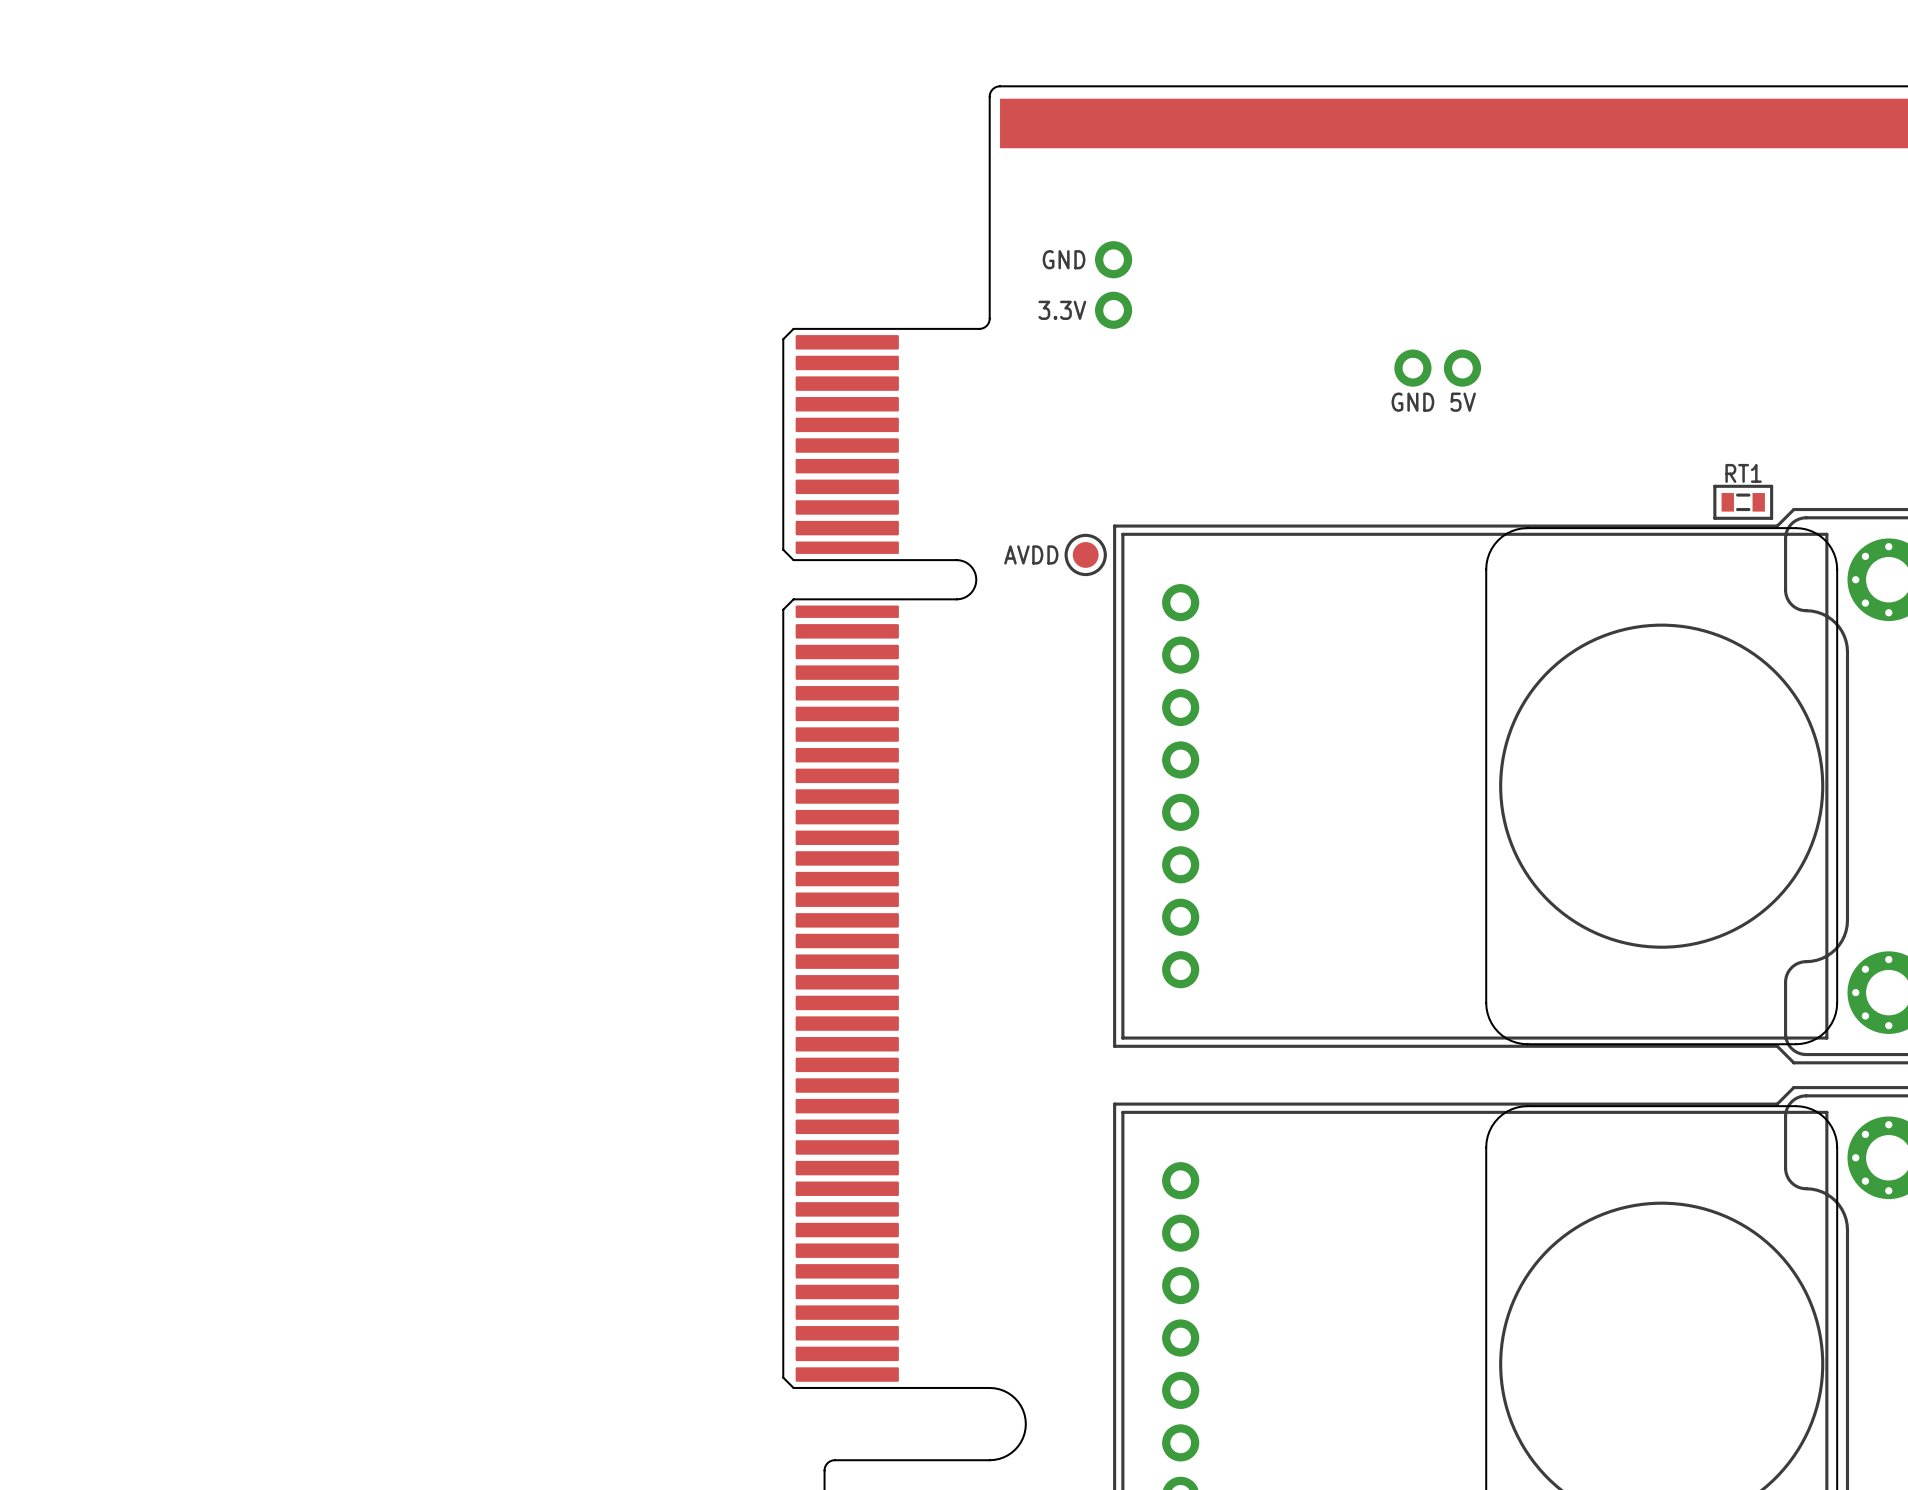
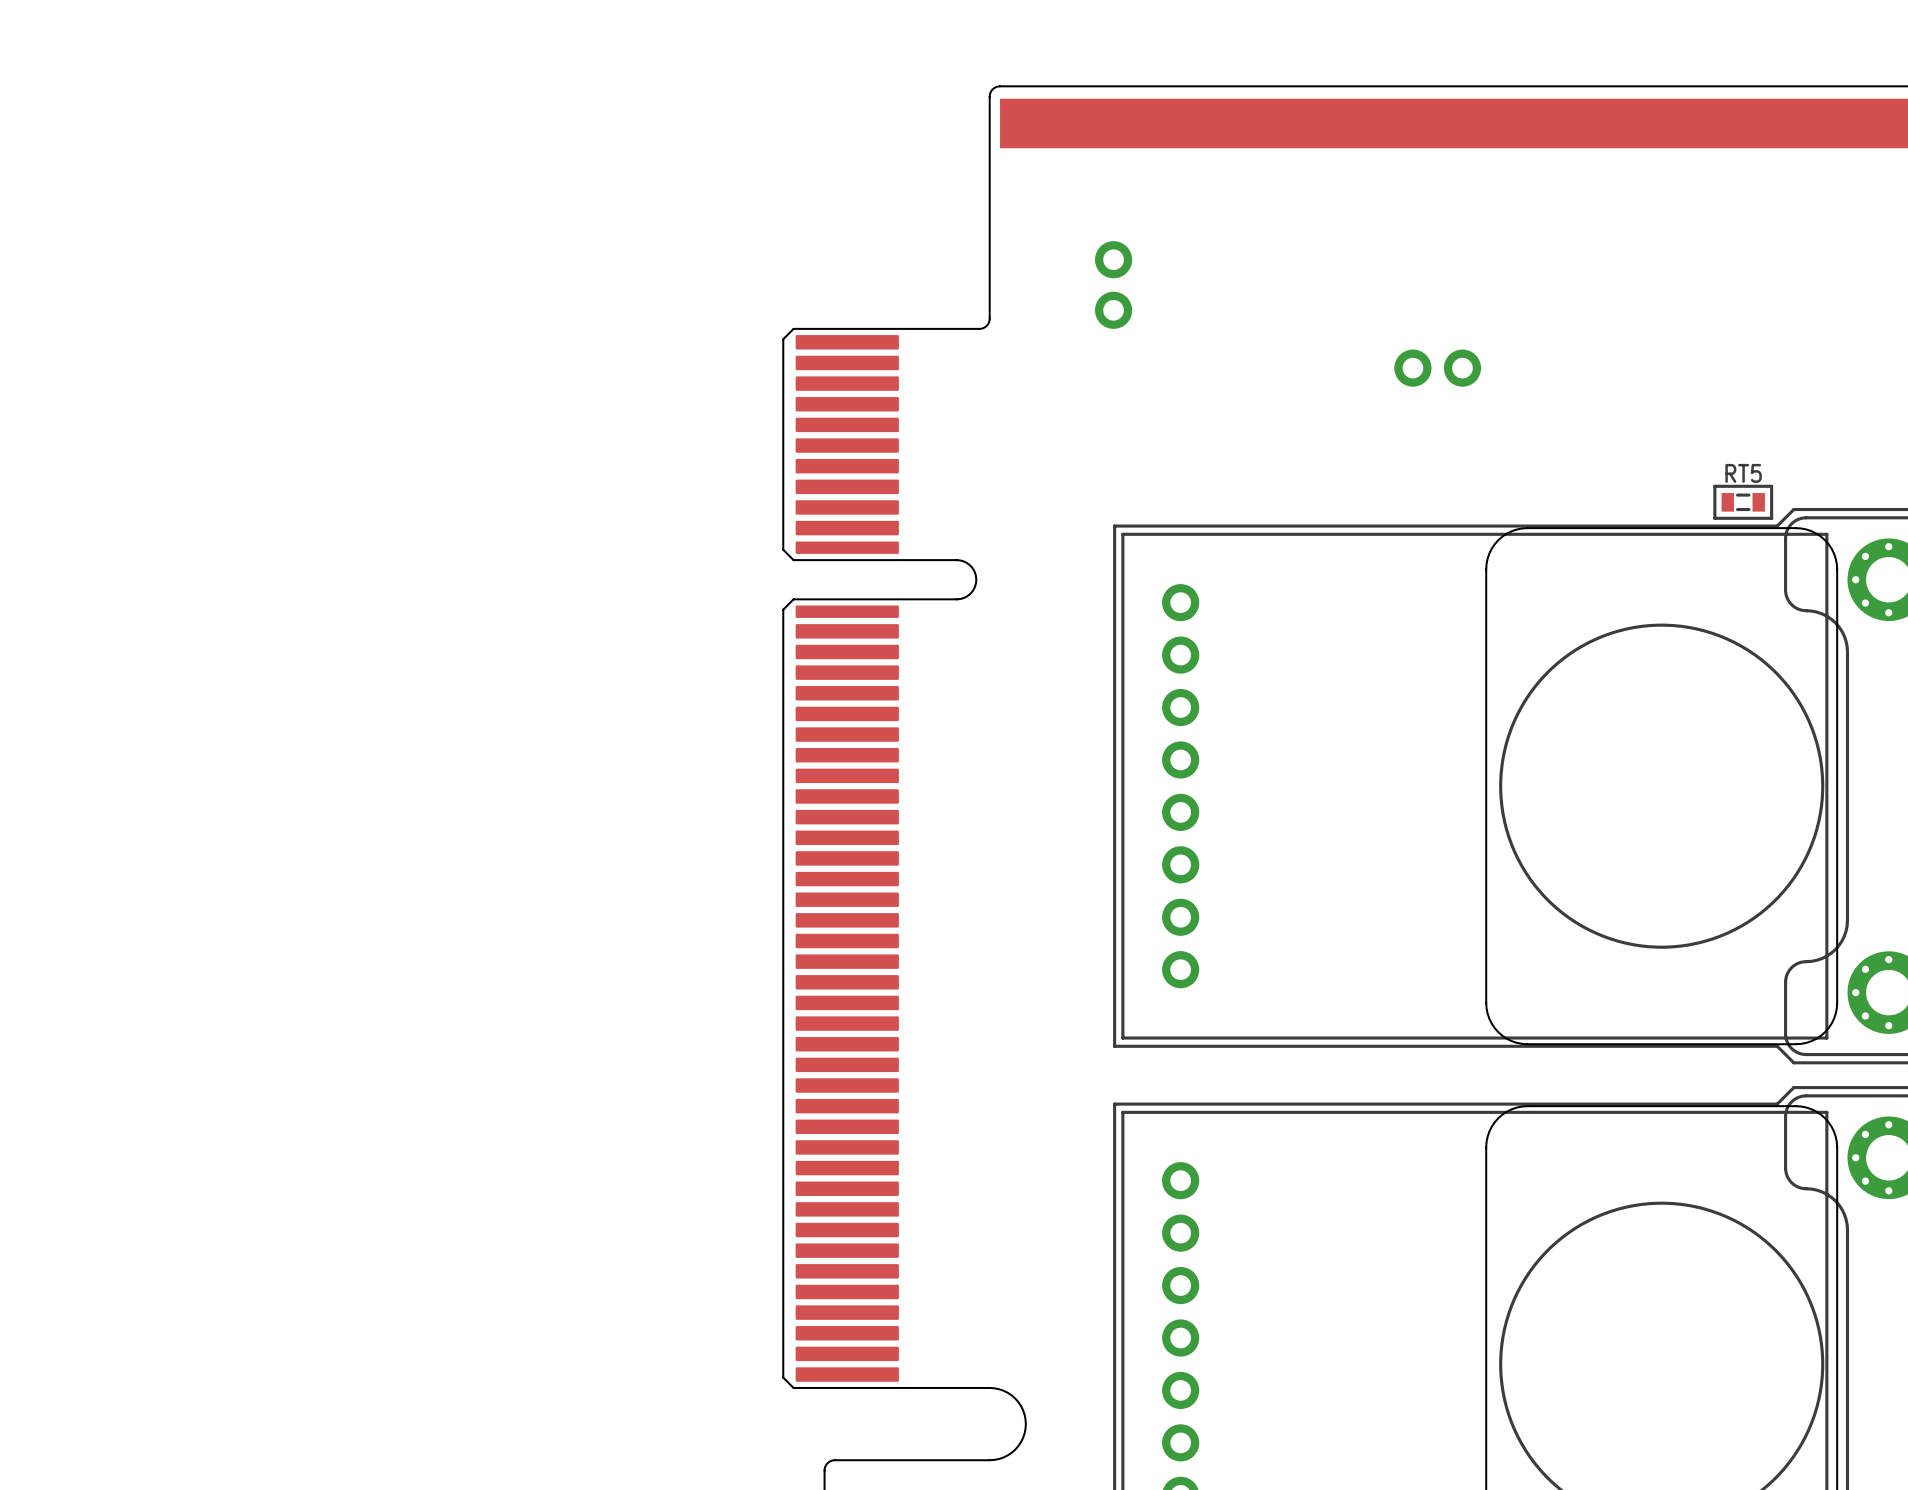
text: GND (1064, 259) -> none
text: 3.3V (1062, 310) -> none
text: GND (1412, 402) -> none
text: 5V (1463, 402) -> none
RT1 name: RT1 (1743, 473) -> RT5 (1743, 473)
text: AVDD (1031, 554) -> none
part: (1085, 554) -> none

